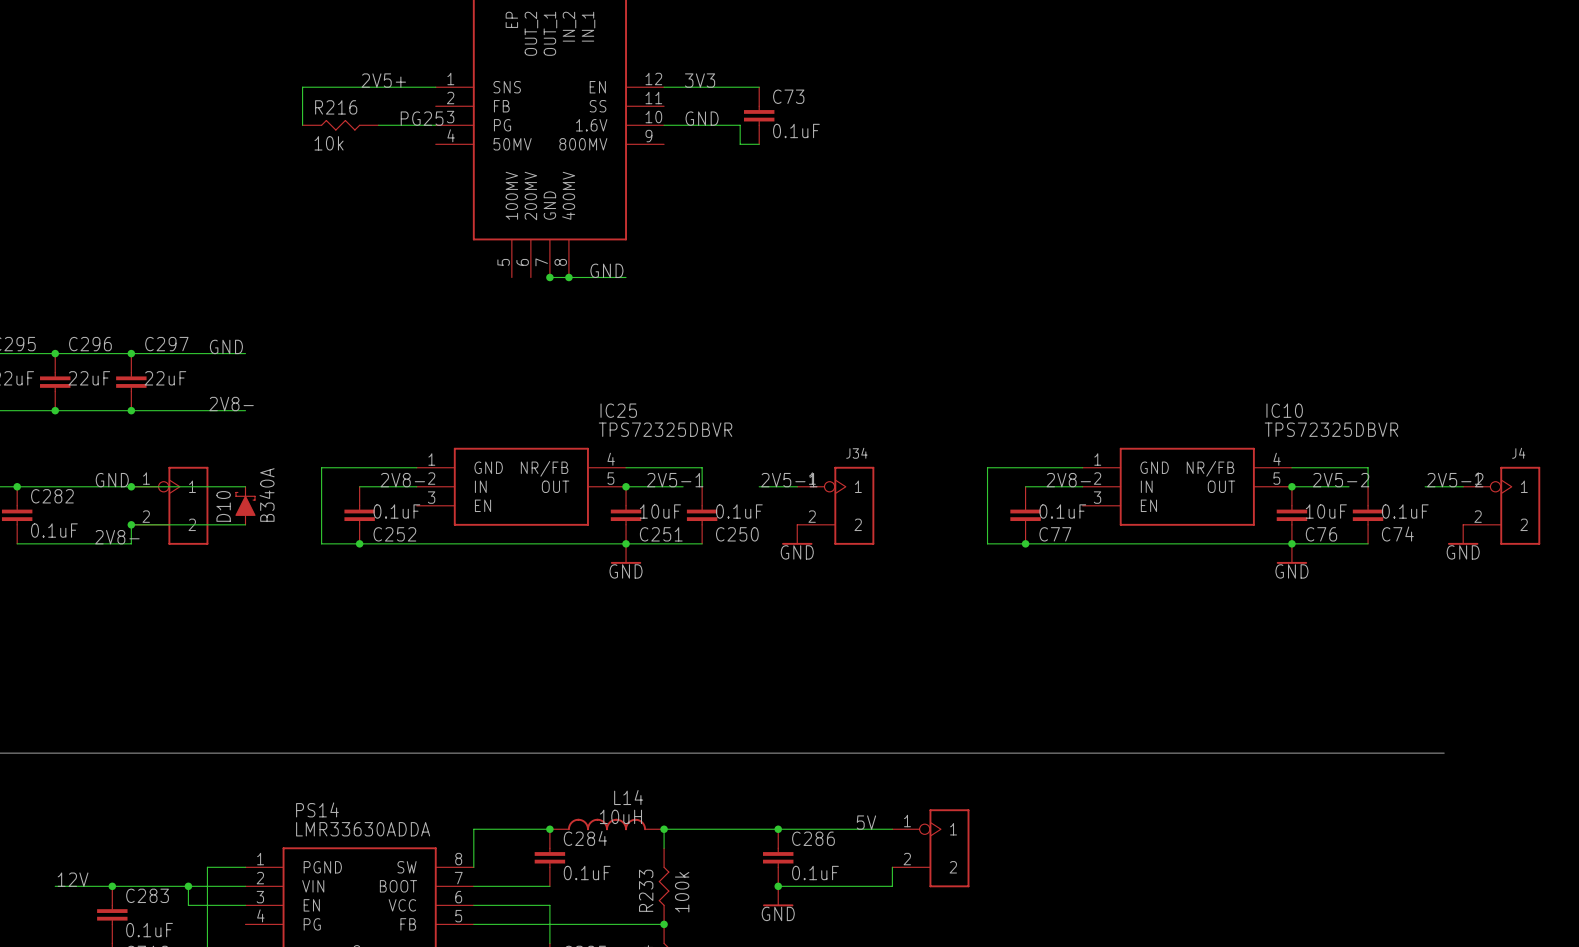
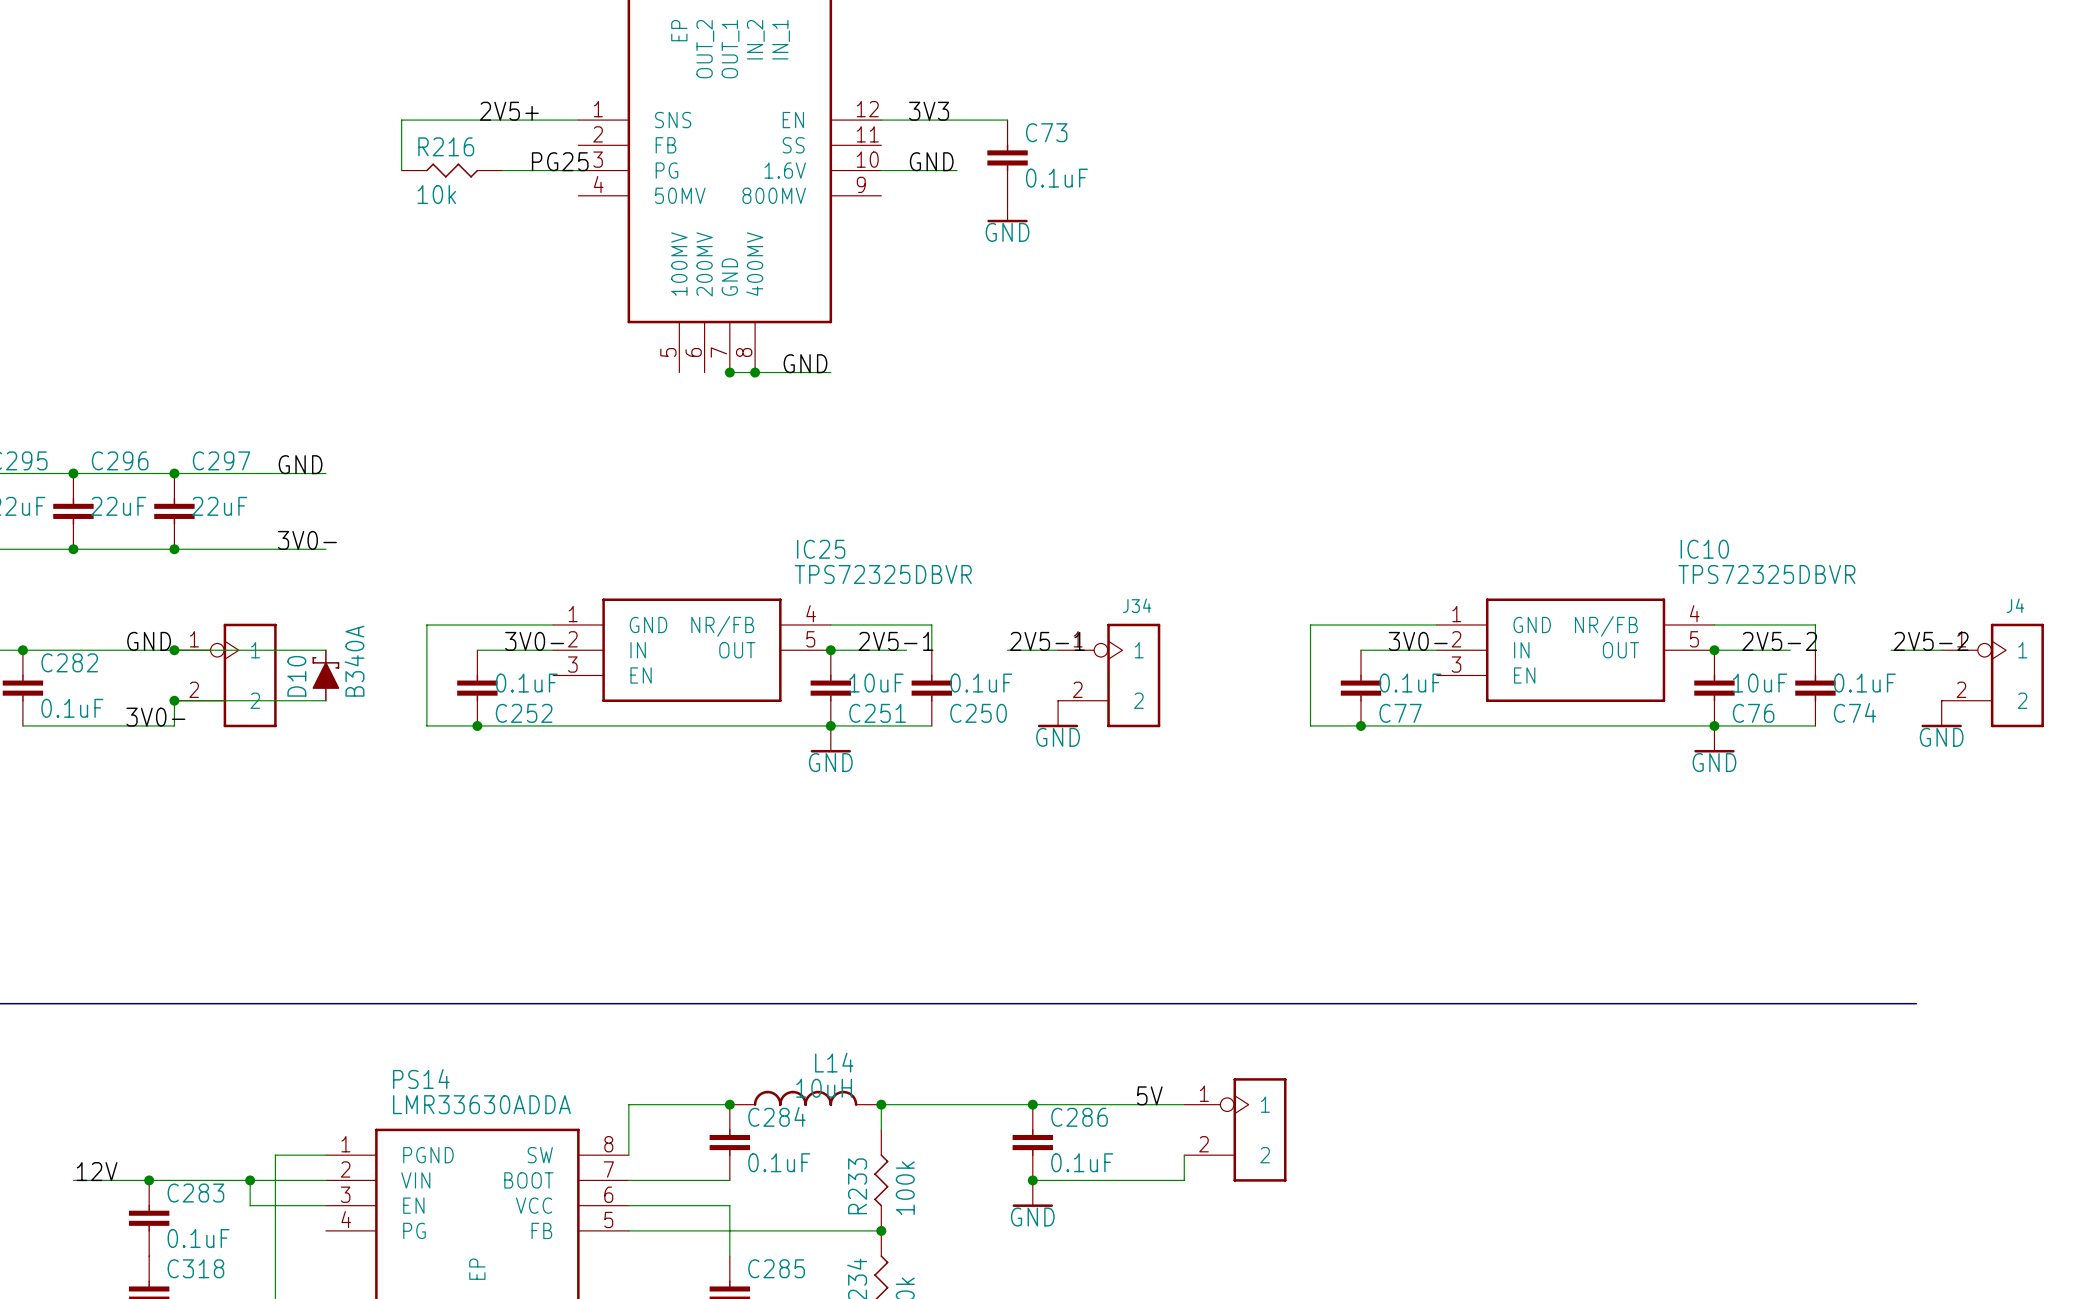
wire: (721, 125) (740, 125) (740, 144) (759, 144) -> none
power symbol: none -> GND (1007, 209)
label: 2V8- (231, 404) -> 3V0- (307, 540)
label: 2V8- (402, 480) -> 3V0- (534, 641)
label: 2V8- (1068, 480) -> 3V0- (1418, 641)
label: 2V8- (117, 537) -> 3V0- (155, 717)

